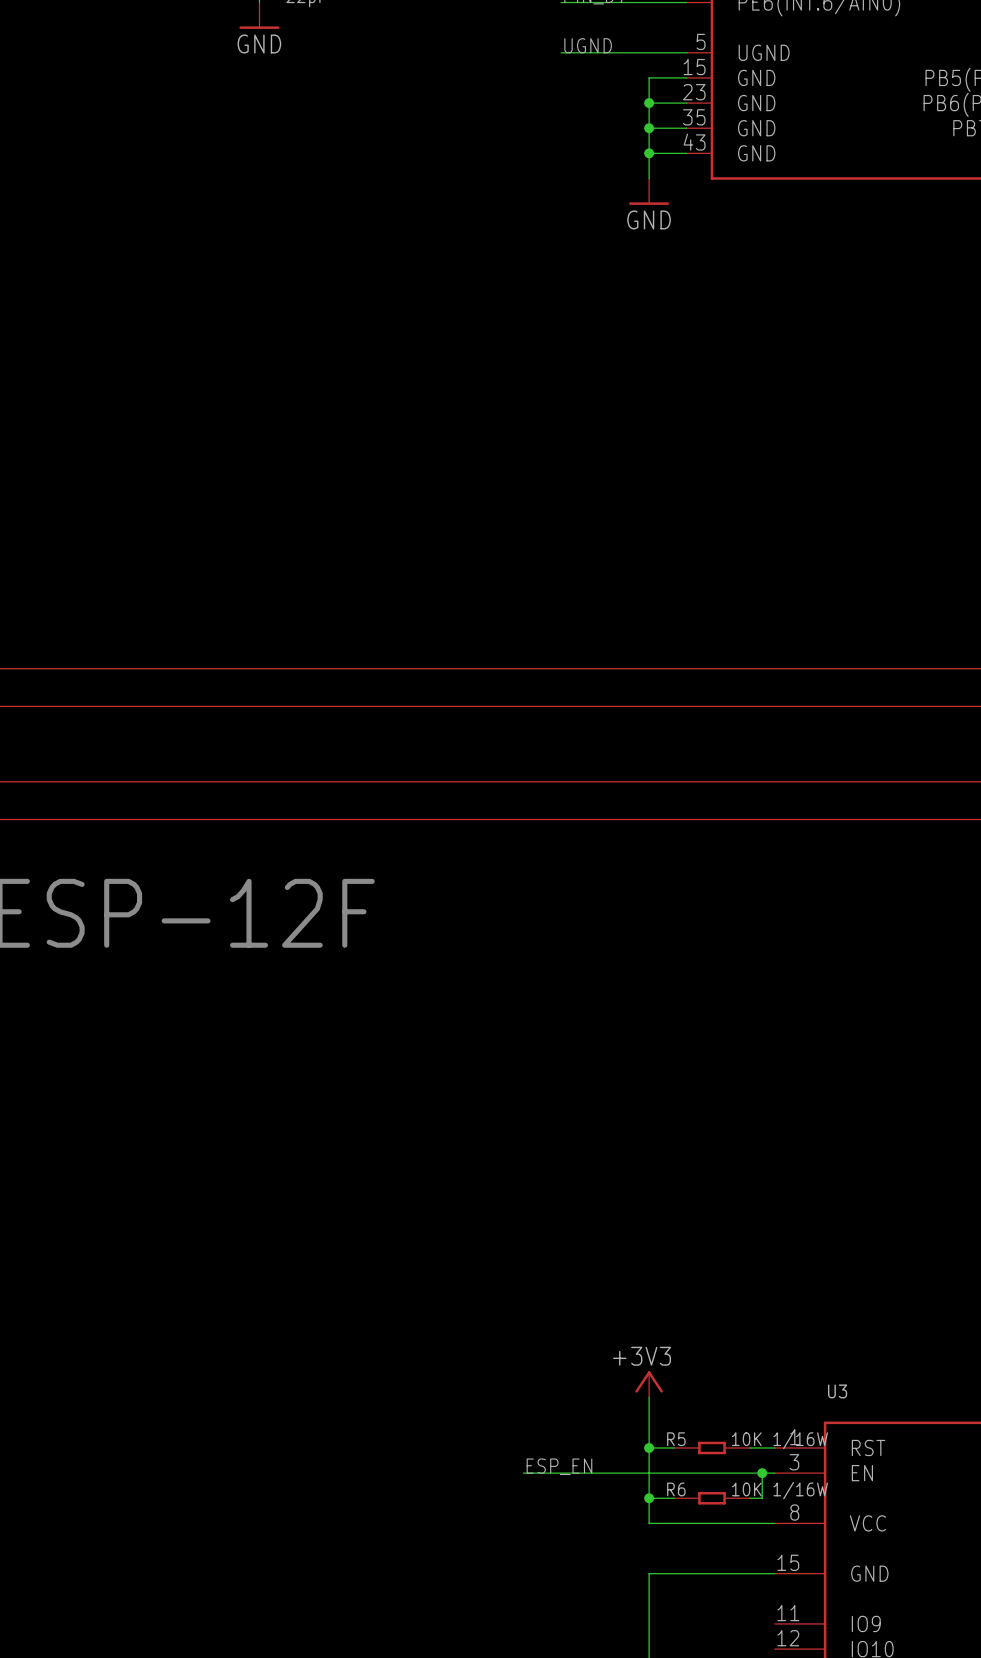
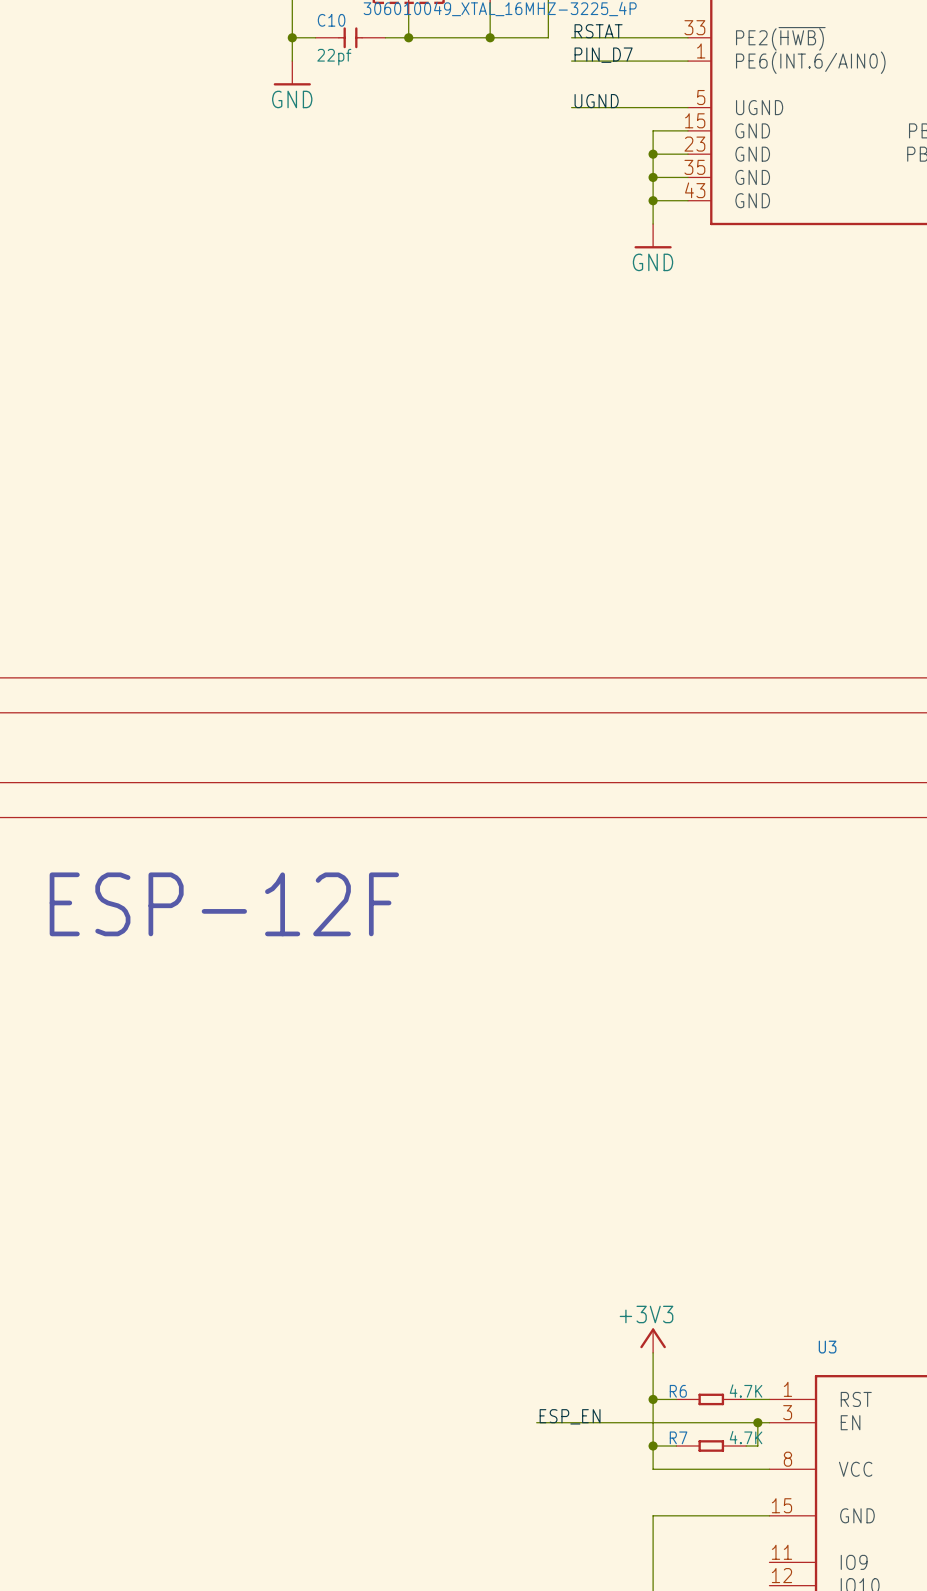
R5 name: R5 (676, 1439) -> R6 (678, 1391)
R5 value: 10K 1/16W (779, 1440) -> 4.7K (746, 1391)
R6 name: R6 (676, 1489) -> R7 (678, 1437)
R6 value: 10K 1/16W (779, 1490) -> 4.7K (746, 1437)

